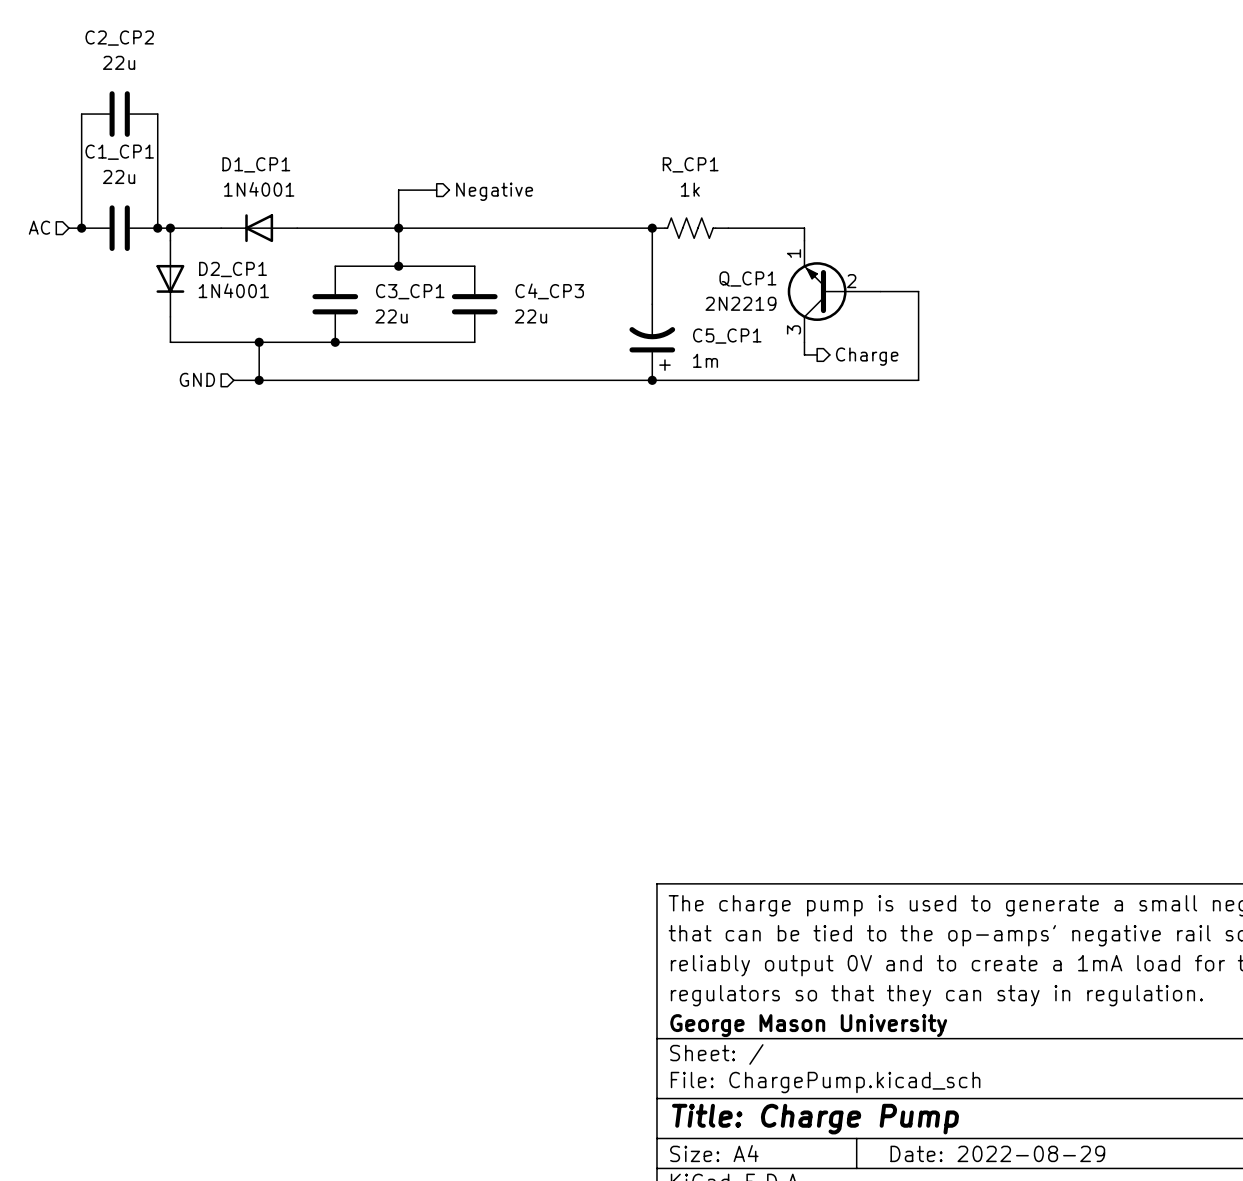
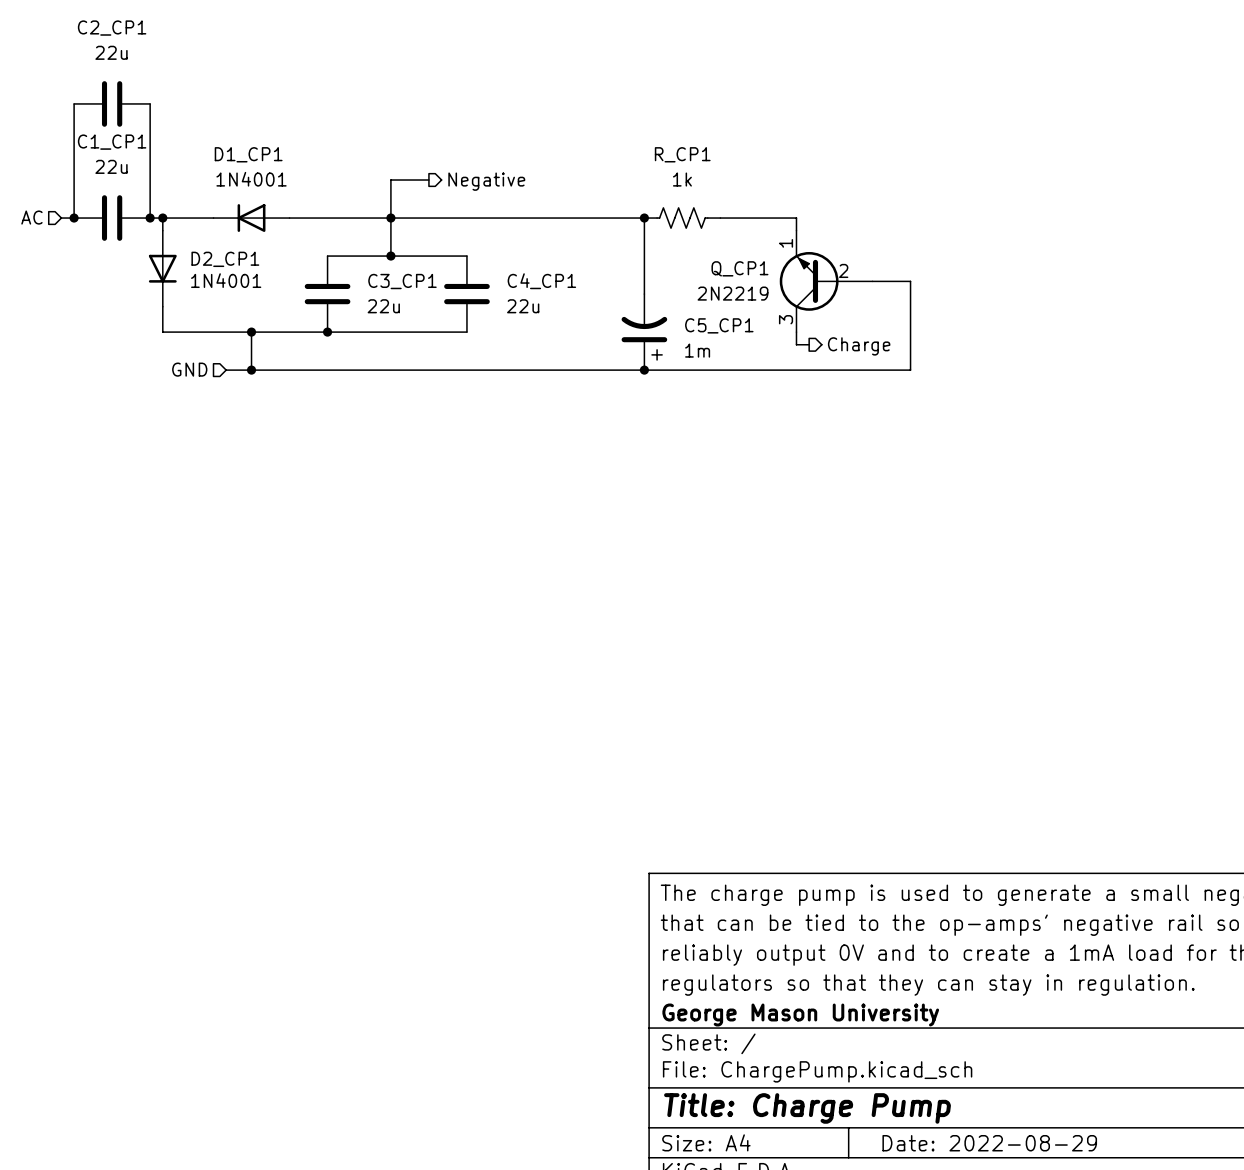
C2_CP2 name: C2_CP2 (119, 38) -> C2_CP1 (112, 28)
C4_CP3 name: C4_CP3 (549, 291) -> C4_CP1 (541, 281)

